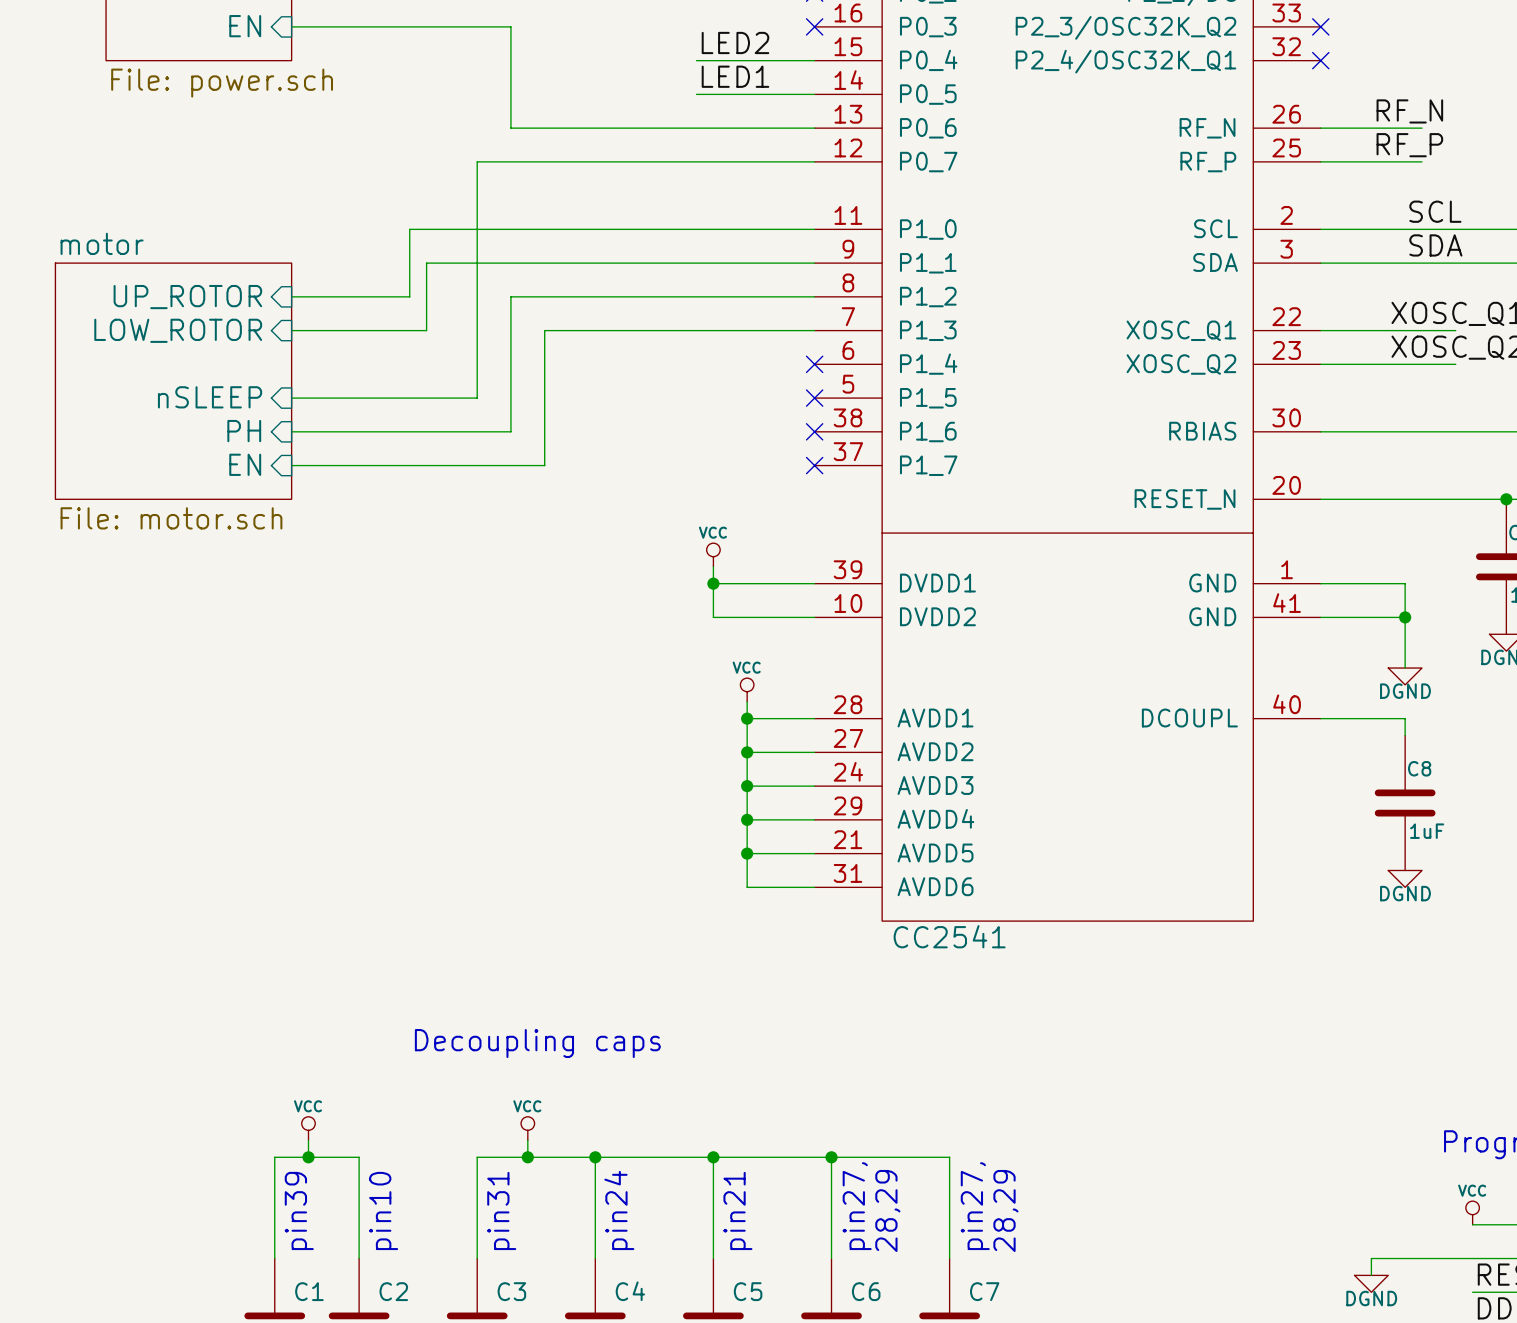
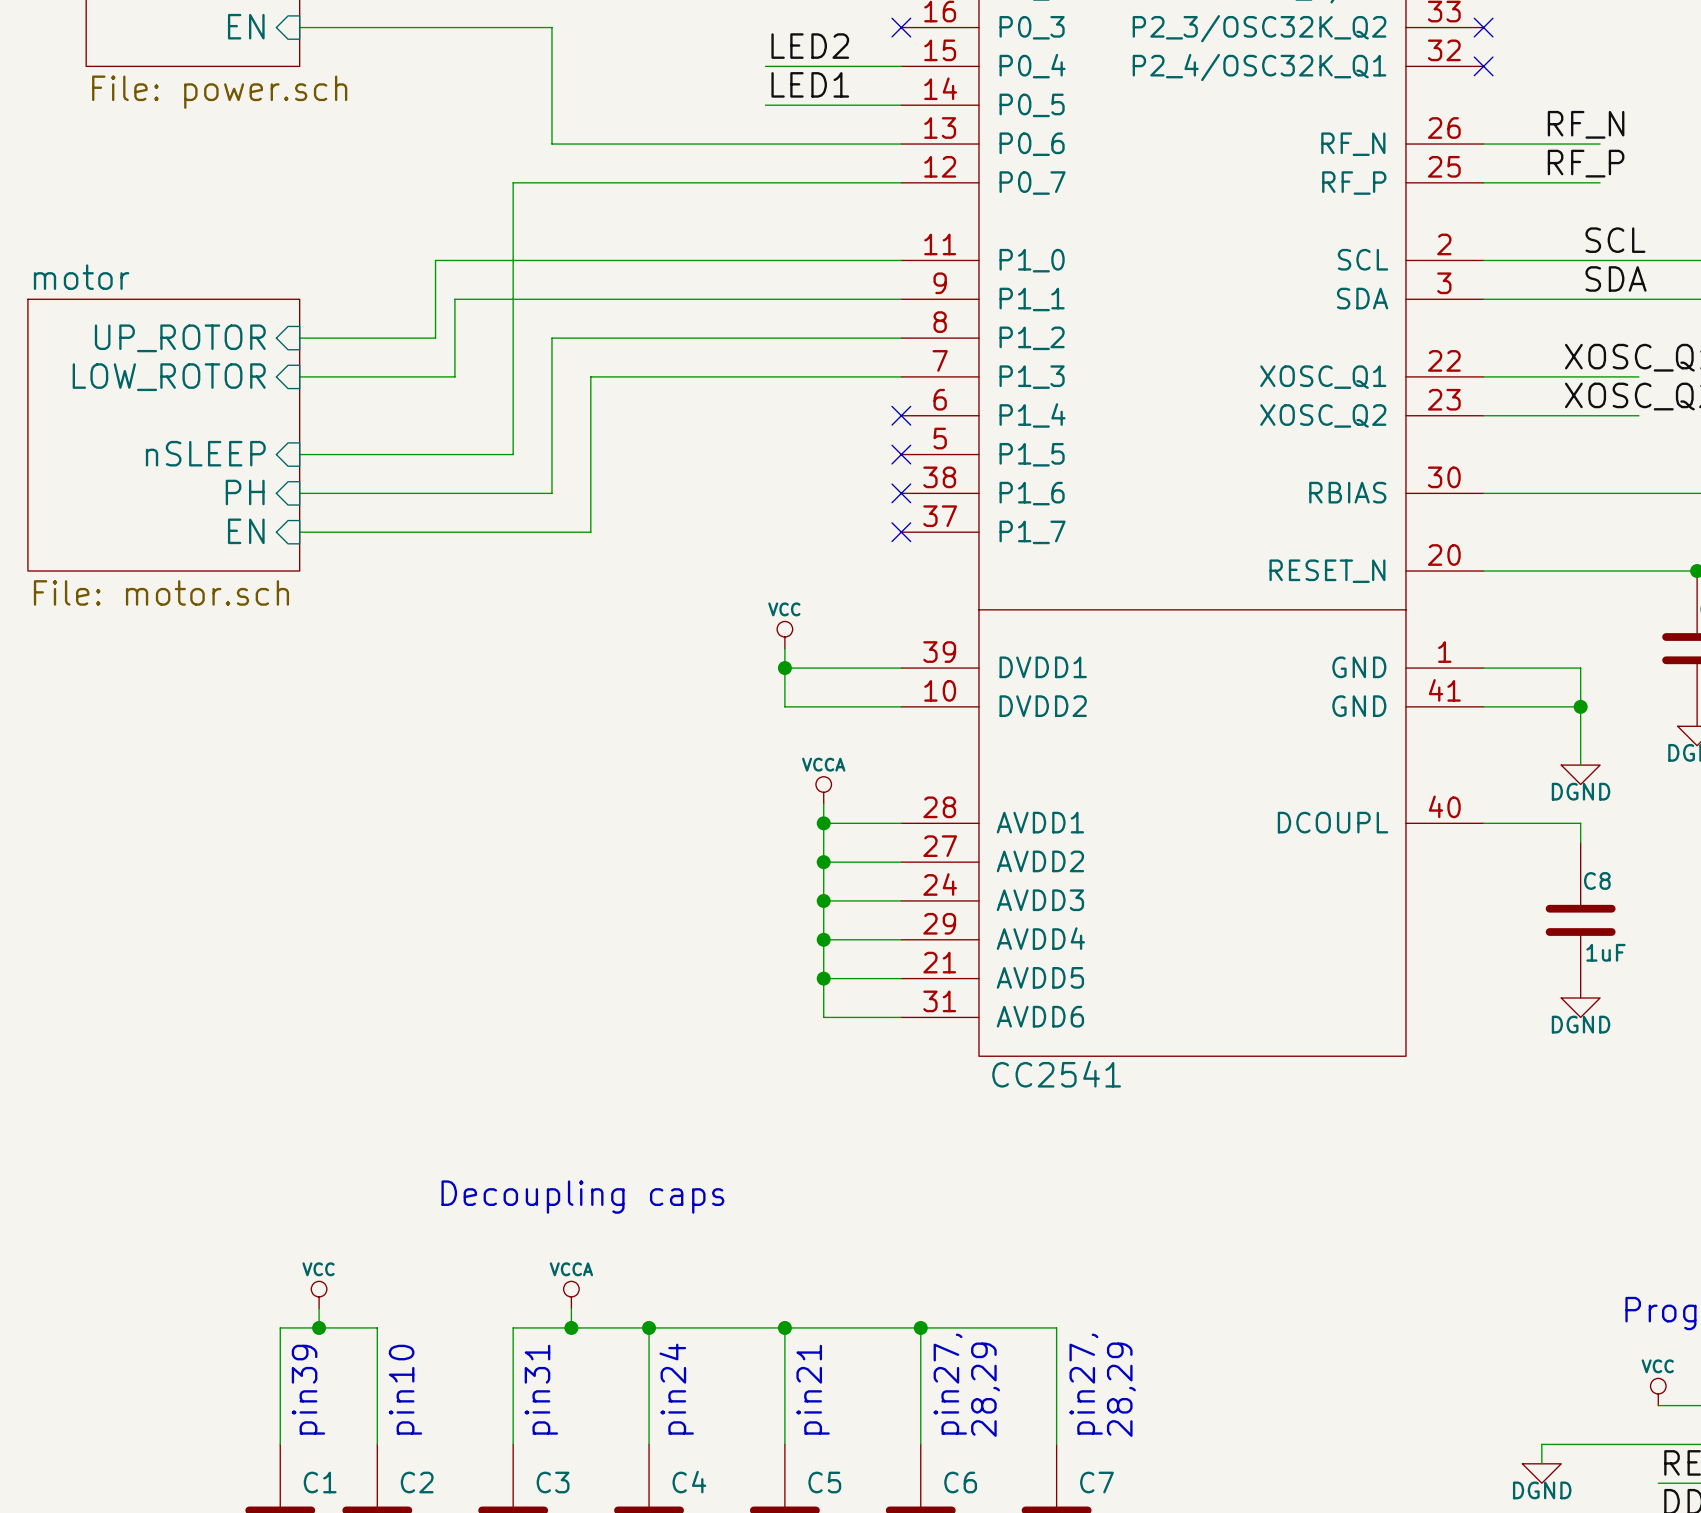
power symbol: VCC (747, 689) -> VCCA (823, 790)
power symbol: VCC (527, 1128) -> VCCA (571, 1294)

